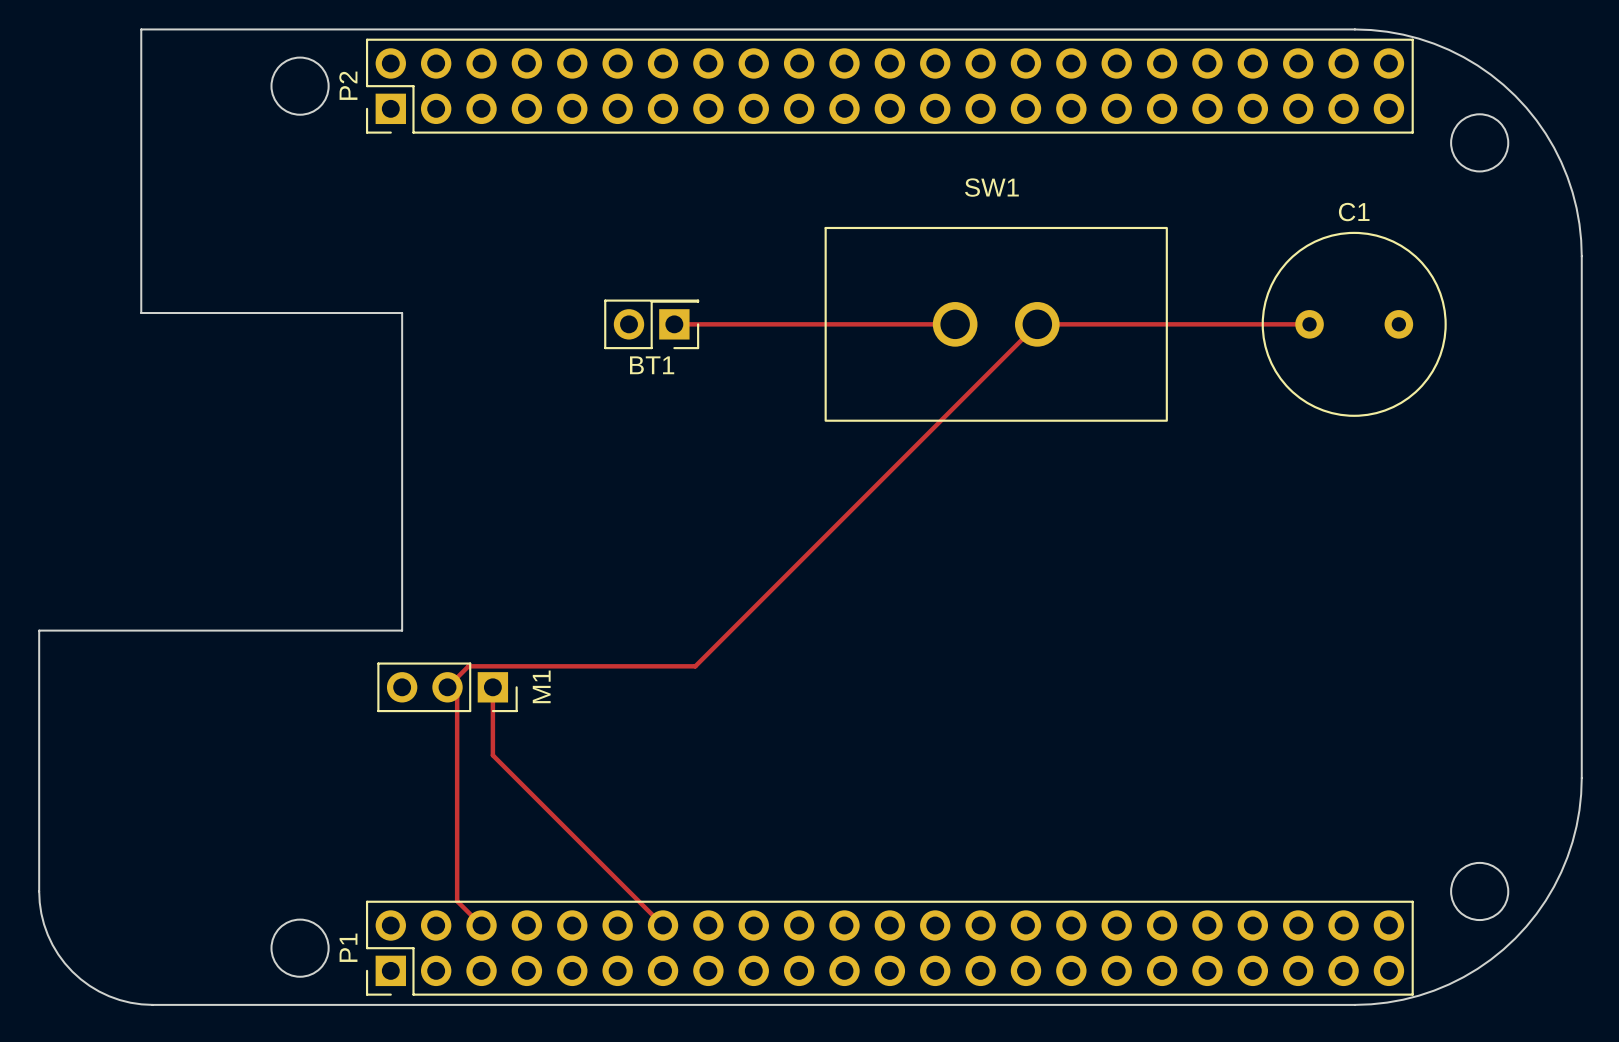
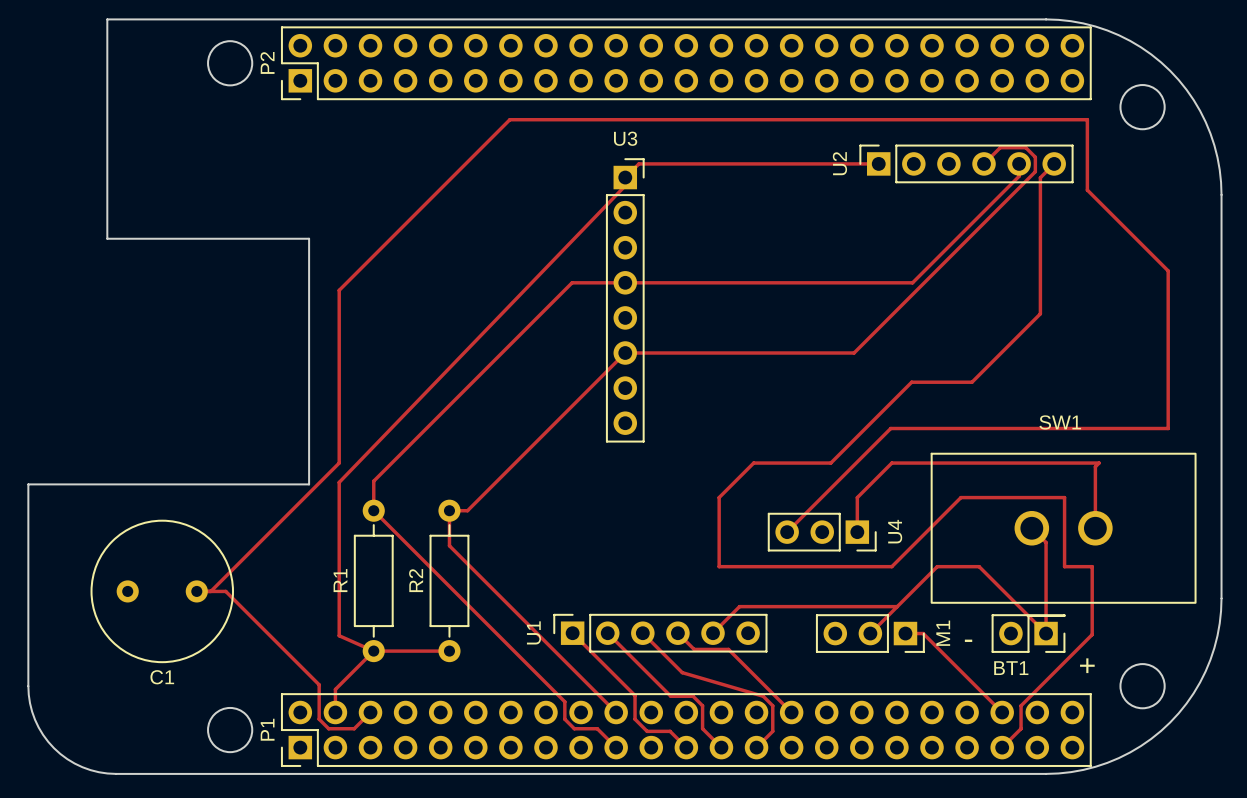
C1 name position: C1 (1354, 212) -> C1 (162, 677)
track: none -> (878, 163) (638, 163) (625, 177) (625, 185) (339, 482) (339, 635) (373, 651)
U2: none -> (966, 163)
track: none -> (984, 163) (1000, 147) (1025, 147) (1035, 157) (1035, 171) (854, 353) (625, 353) (467, 510) (449, 510) (449, 545) (616, 712)
track: none -> (1019, 163) (1019, 176) (912, 282) (572, 282) (373, 481) (373, 510) (564, 701) (564, 719) (574, 728) (597, 728) (616, 747)
track: none -> (1054, 163) (1040, 177) (1040, 313) (972, 382) (911, 382) (830, 463) (753, 463) (719, 497) (719, 566) (891, 566) (960, 497) (1064, 497) (1064, 566) (1092, 566) (1092, 634) (1021, 705) (1021, 728) (1002, 747)
BT1 position: (651, 324) -> (1028, 633)
track: (674, 324) (955, 324) -> none
SW1 position: (996, 324) -> (1063, 528)
track: (1309, 324) (1037, 324) (695, 666) (468, 666) (447, 687) (457, 696) (457, 901) (481, 925) -> (196, 591) (225, 591) (319, 684) (319, 719) (328, 728) (354, 728) (370, 712)
C1 position: (1354, 324) -> (162, 591)
BT1 name position: BT1 (652, 365) -> BT1 (1011, 668)
U3: none -> (625, 300)
M1 position: (447, 687) -> (870, 633)
track: (492, 687) (492, 755) (663, 925) -> none
track: none -> (1031, 528) (1046, 542) (1046, 633) (979, 566) (937, 566) (870, 633)
track: none -> (1095, 528) (1095, 466) (1099, 463) (891, 463) (857, 497) (857, 532)
track: none -> (787, 532) (890, 428) (1168, 428) (1168, 270) (1087, 190) (1087, 119) (509, 119) (339, 290) (339, 463) (210, 591)
U4: none -> (822, 532)
R1: none -> (373, 580)
R2: none -> (449, 580)
track: none -> (897, 606) (739, 606) (713, 633)
track: none -> (572, 633) (635, 695) (635, 719) (647, 731) (670, 731) (686, 747)
track: none -> (607, 633) (670, 696) (693, 696) (702, 705) (702, 728) (721, 747)
track: none -> (642, 633) (682, 672) (763, 696) (772, 705) (772, 731) (756, 747)
U1: none -> (660, 633)
track: none -> (677, 633) (694, 649) (728, 649) (791, 712)
track: none -> (905, 633) (923, 633) (1002, 712)
text: none -> - (968, 640)
track: none -> (373, 651) (335, 689) (335, 712)
track: none -> (373, 651) (449, 651)
text: none -> + (1087, 665)

